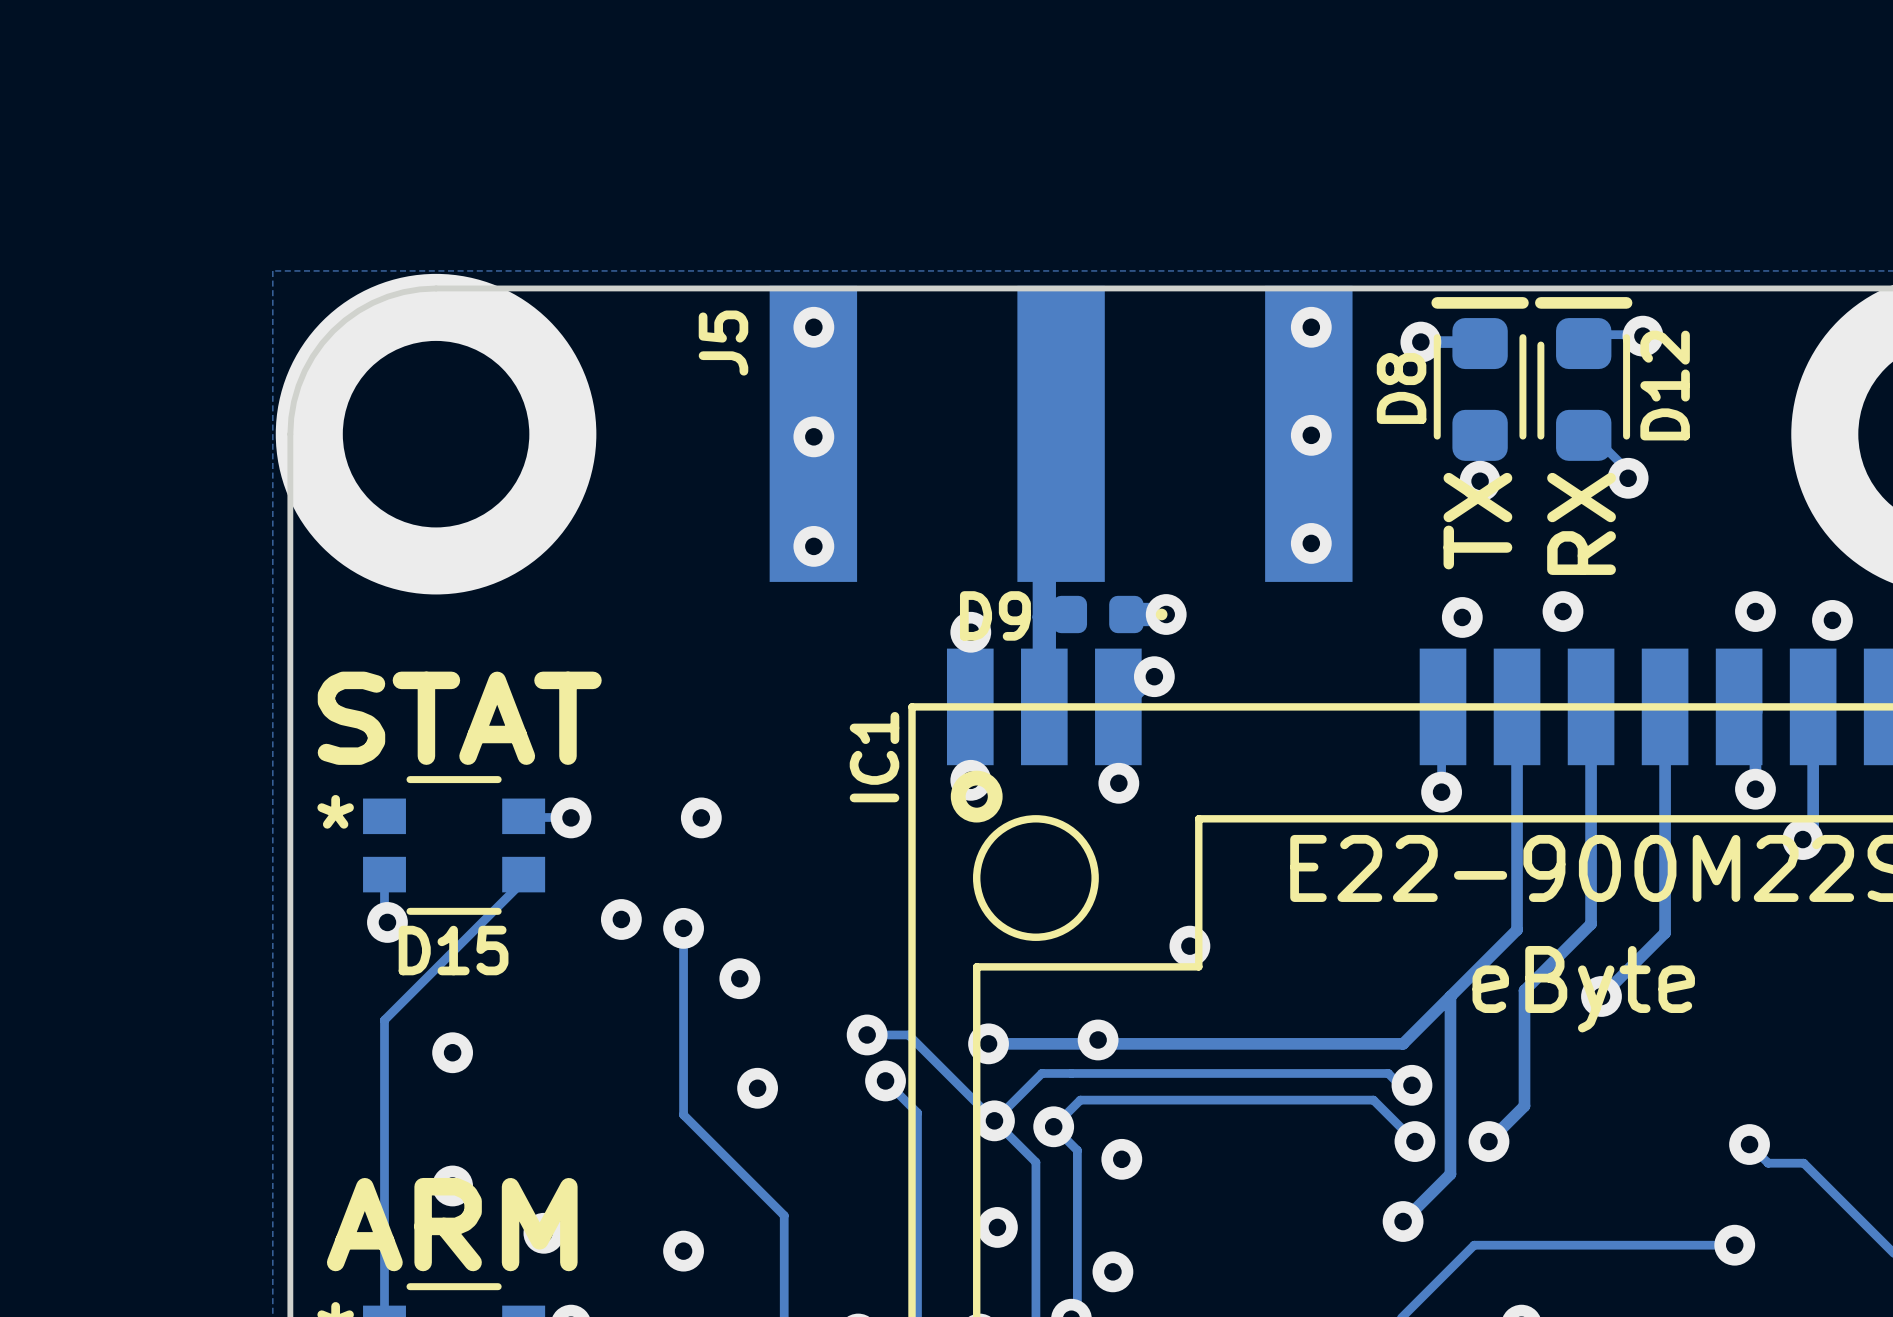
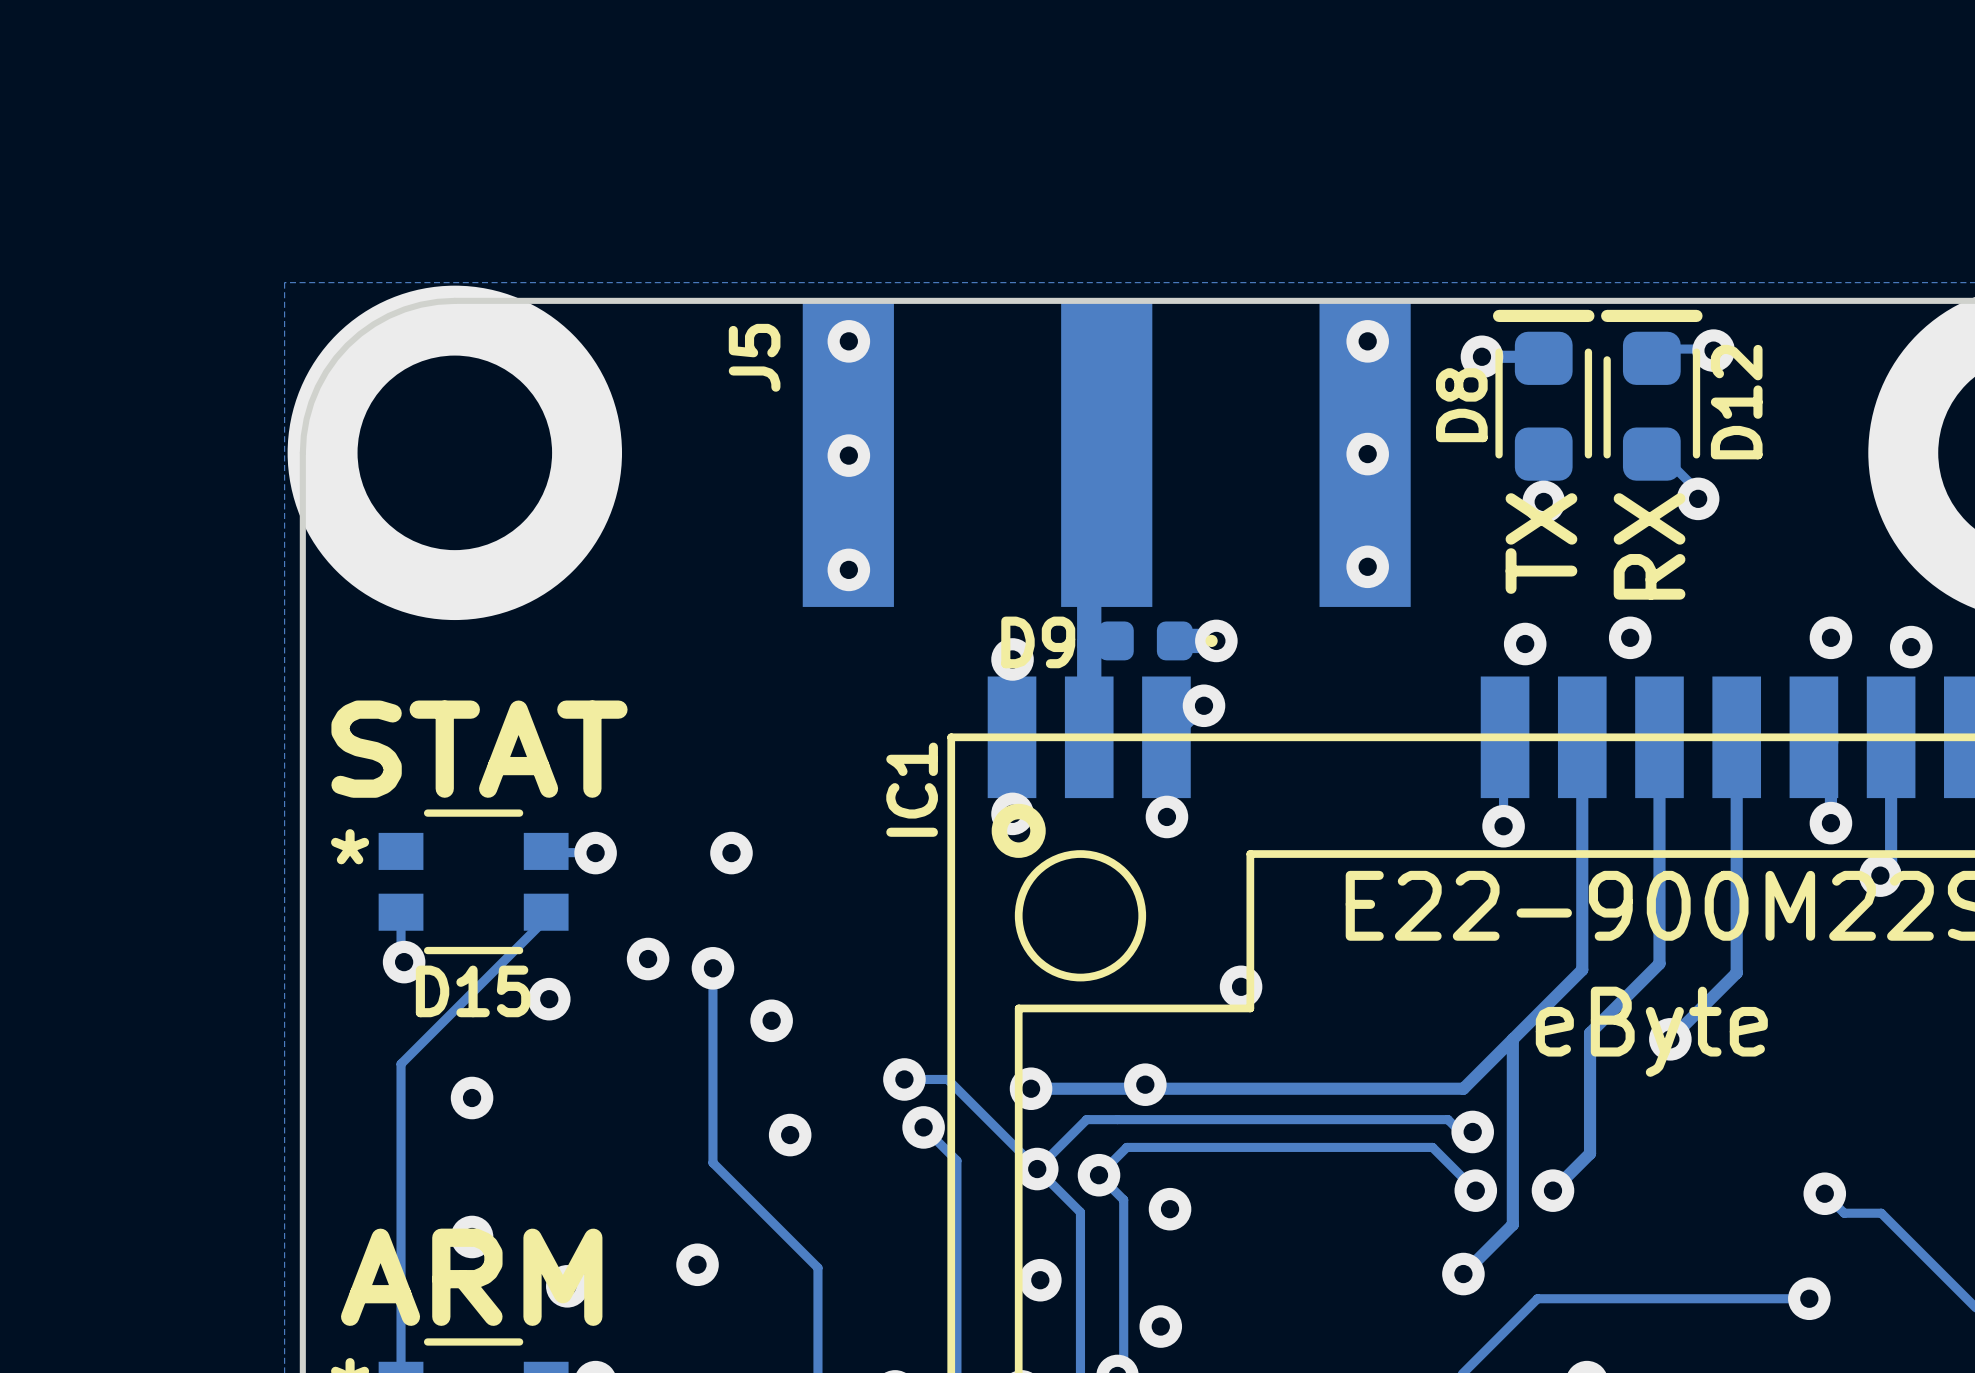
via: none -> (549, 999)
via position: (683, 1251) -> (697, 1264)

